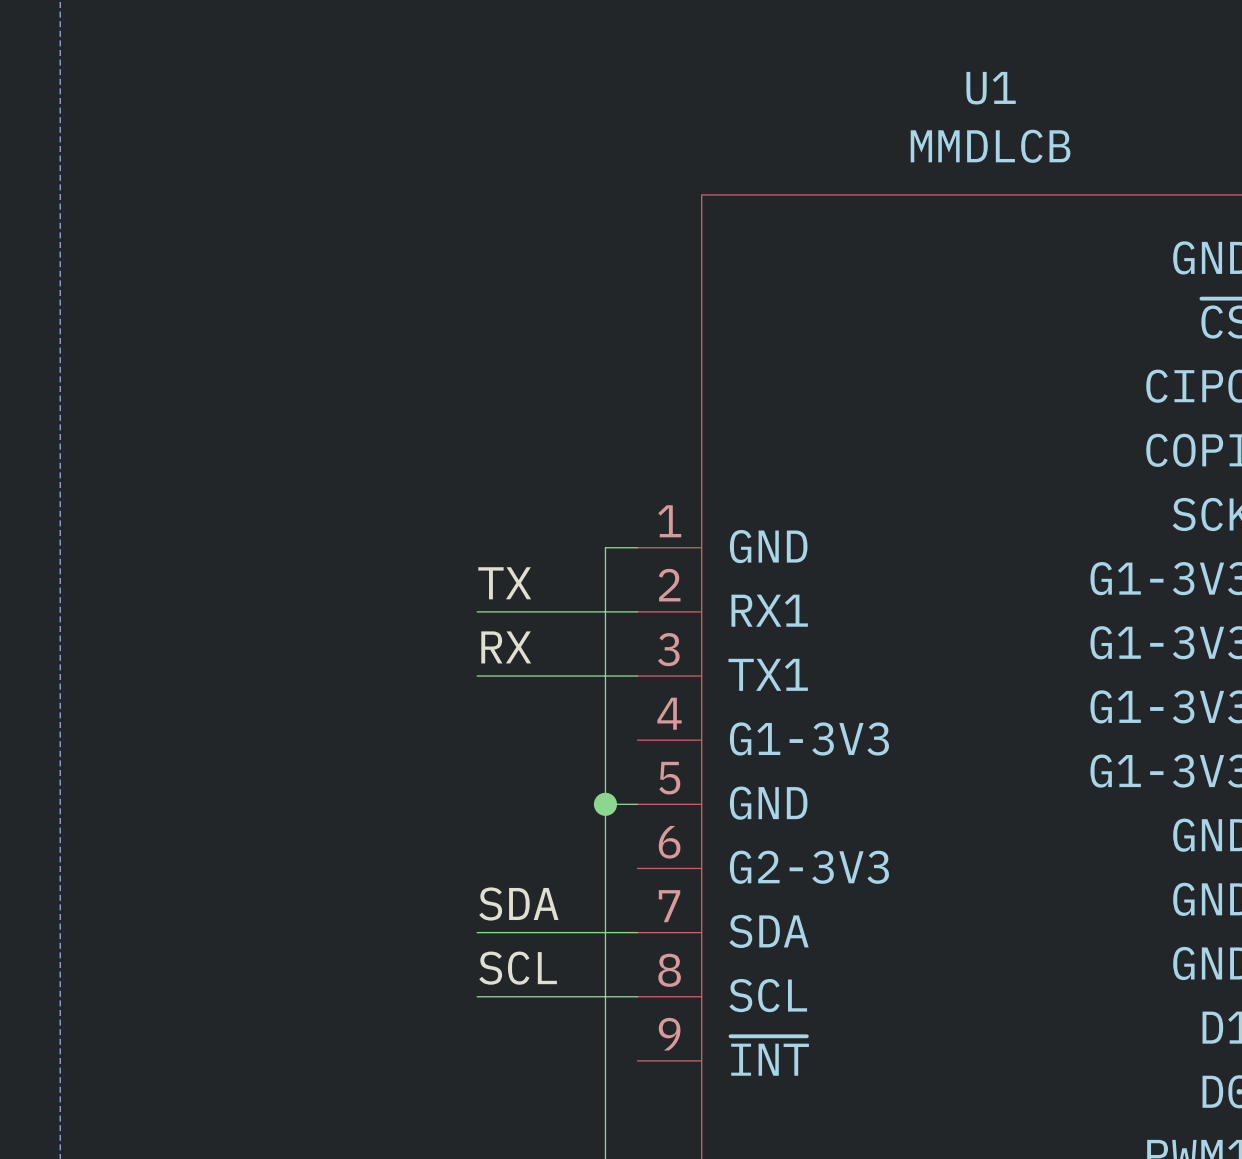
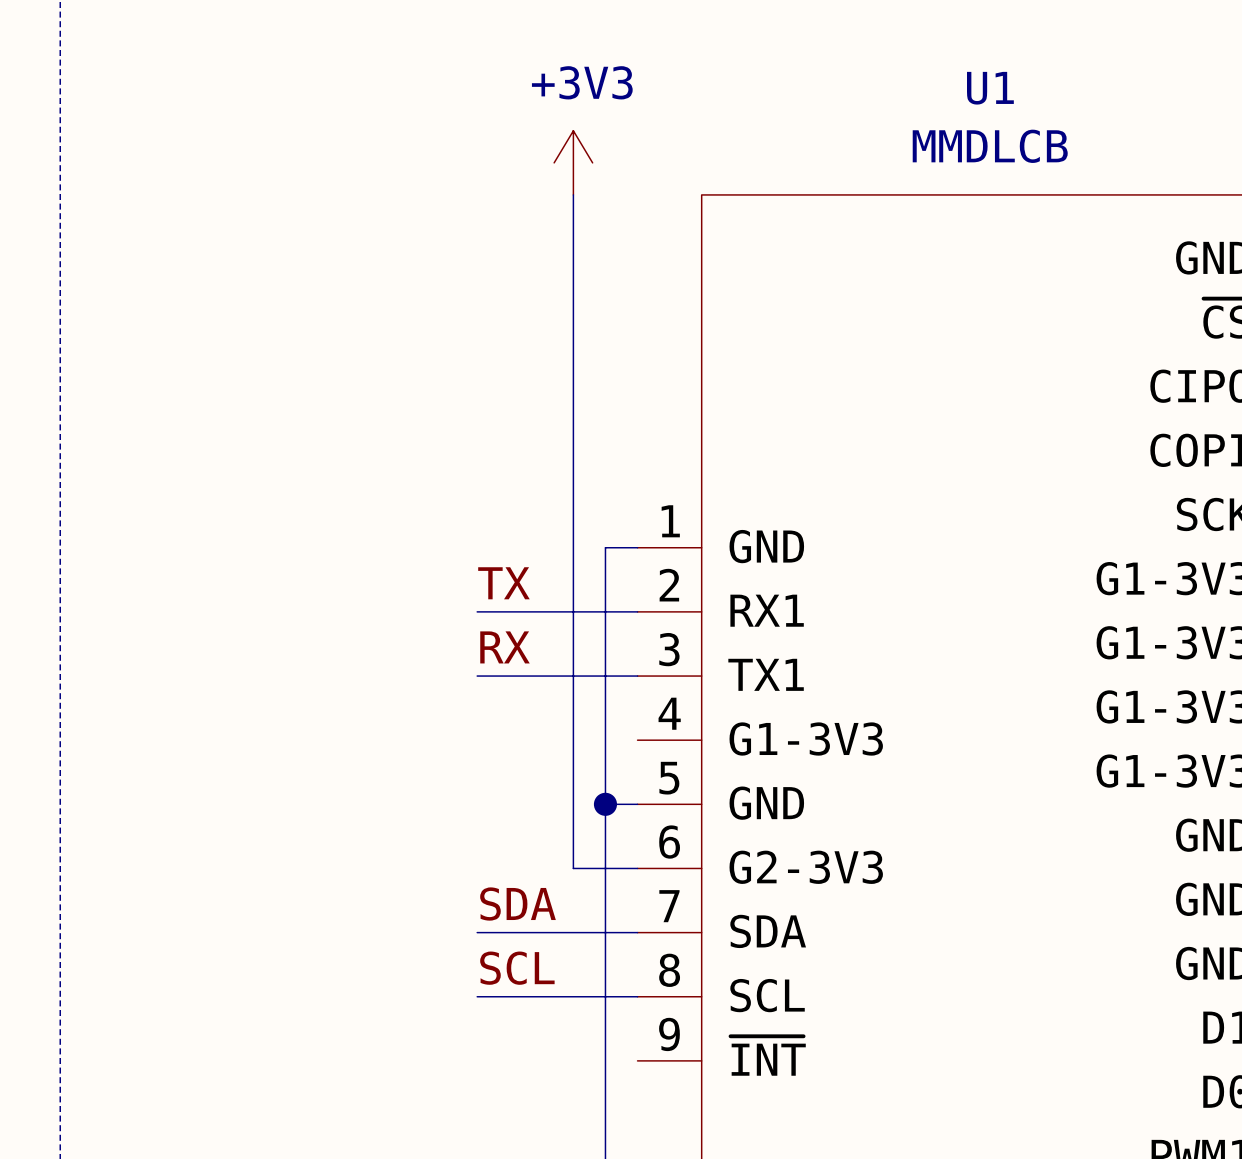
power symbol: none -> +3V3 (573, 162)
wire: none -> (573, 194) (573, 868) (637, 868)

